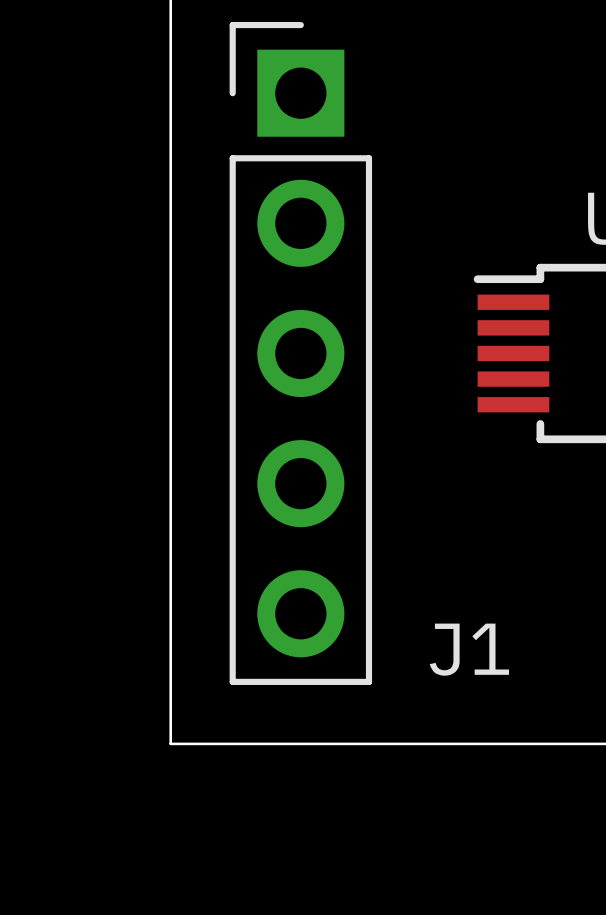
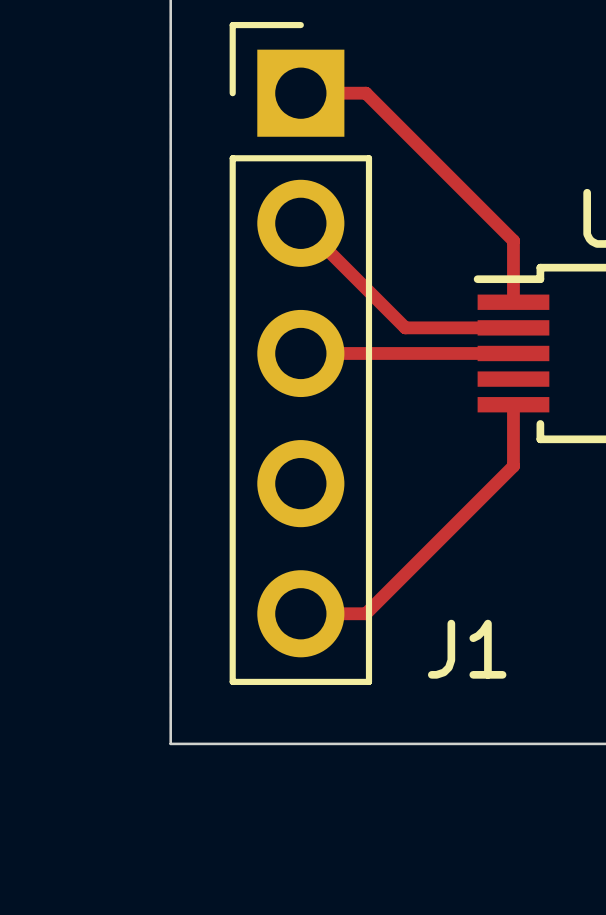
track: none -> (300, 93) (365, 93) (513, 240) (513, 302)
track: none -> (300, 223) (405, 327) (513, 327)
track: none -> (300, 353) (513, 353)
track: none -> (513, 404) (513, 466) (365, 613) (300, 613)

